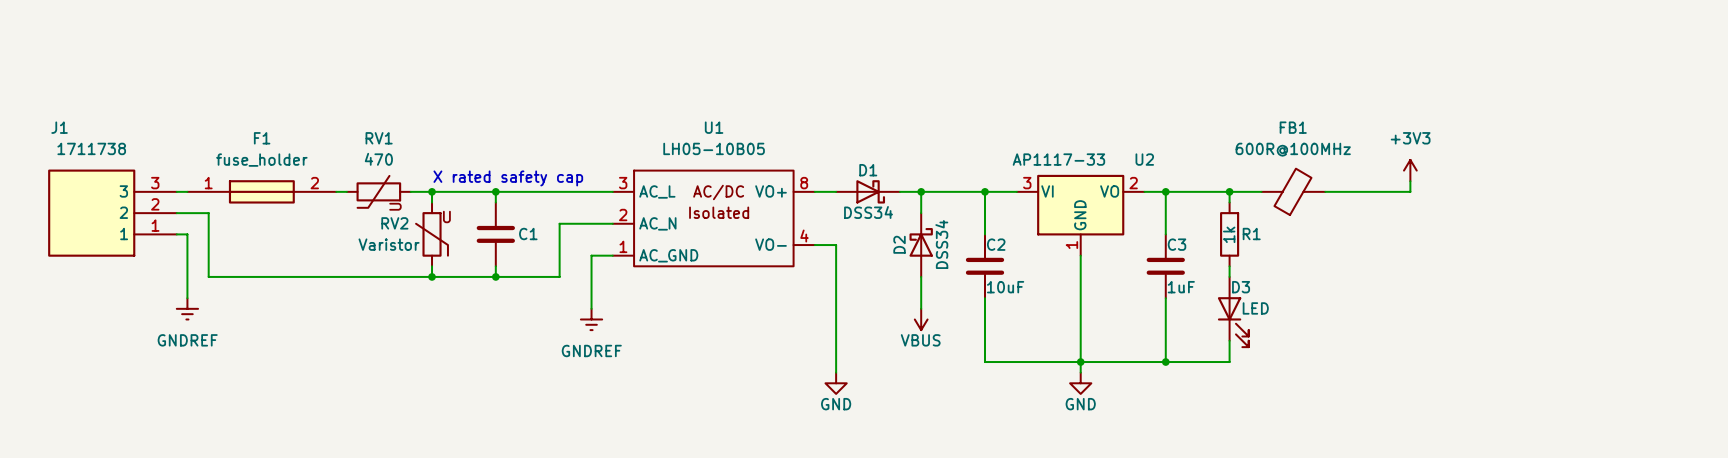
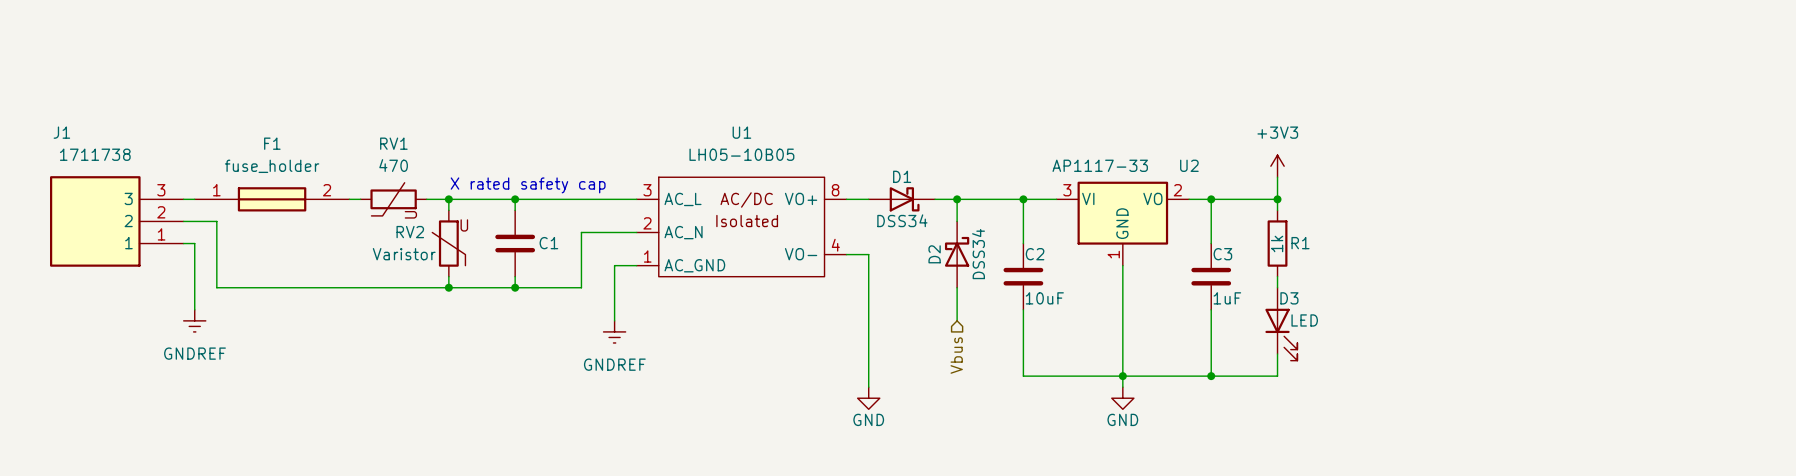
power symbol position: +3V3 (1410, 170) -> +3V3 (1277, 166)
wire: (1410, 181) (1410, 191) (1325, 191) -> none
wire: (1229, 191) (1261, 191) -> (1277, 199) (1277, 177)
FB1: 600R@100MHz (1293, 191) -> none
power symbol: VBUS (921, 319) -> none
hierarchical label: none -> Vbus (956, 355)

